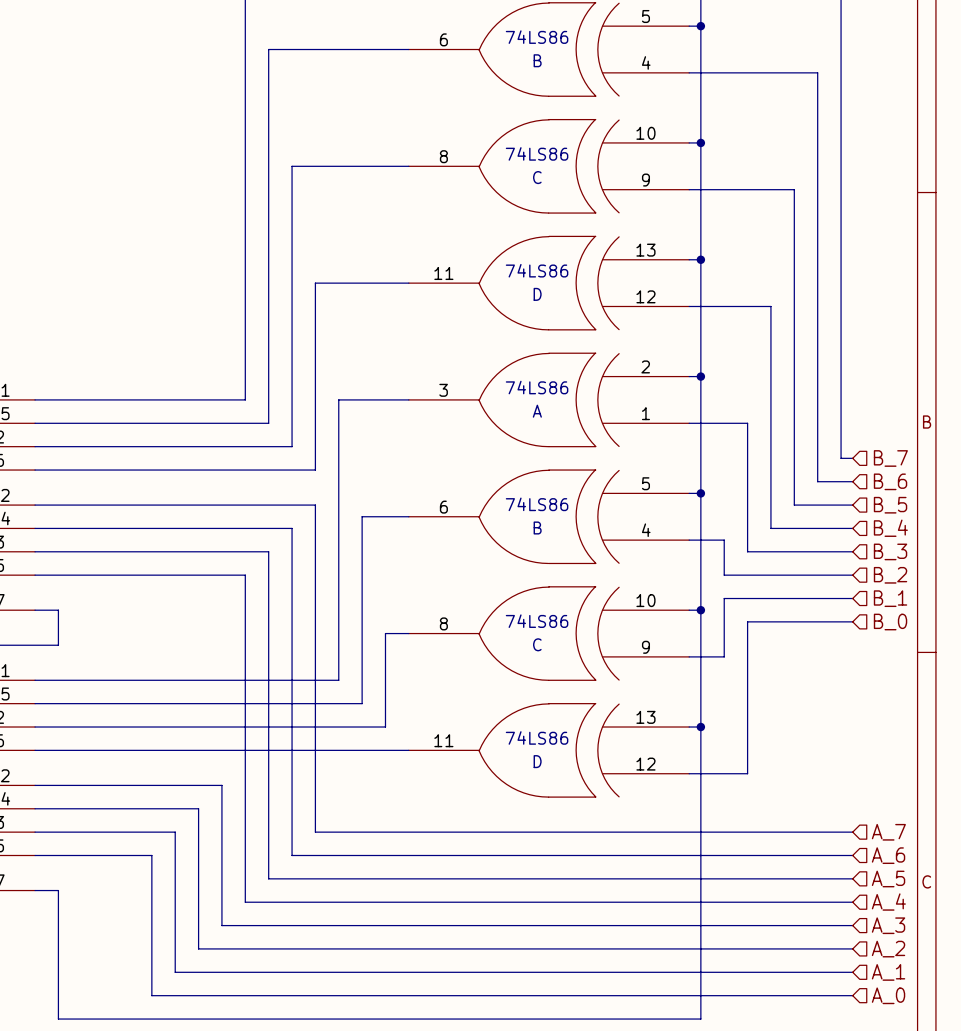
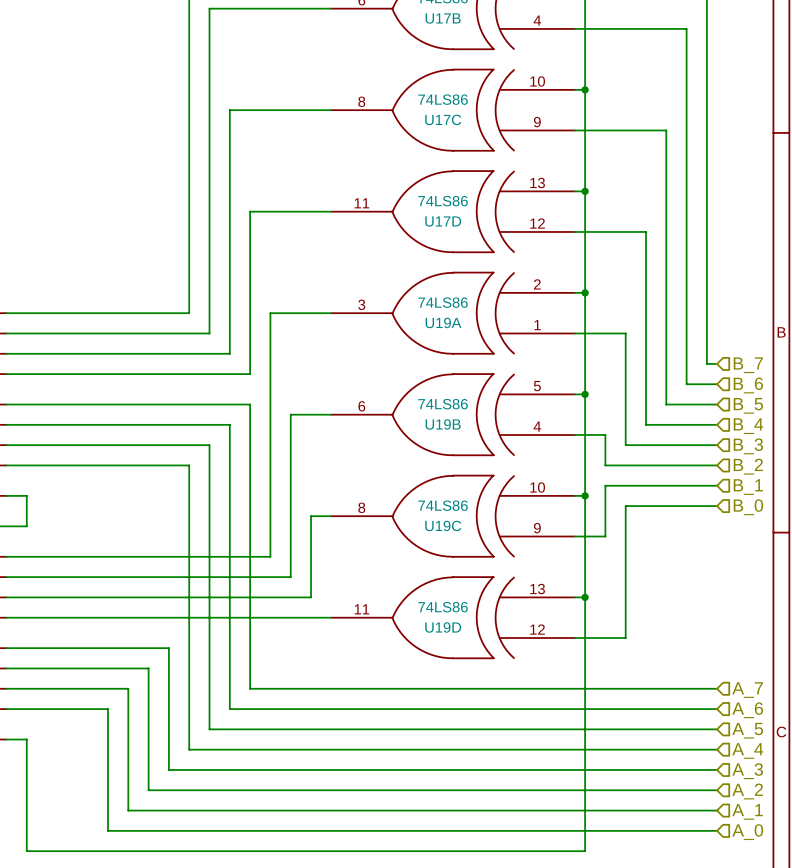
B name: B (537, 60) -> U17B (443, 18)
C name: C (537, 177) -> U17C (443, 119)
D name: D (537, 294) -> U17D (443, 221)
A name: A (537, 411) -> U19A (443, 322)
B name: B (537, 527) -> U19B (443, 424)
C name: C (537, 644) -> U19C (443, 525)
D name: D (537, 761) -> U19D (443, 627)

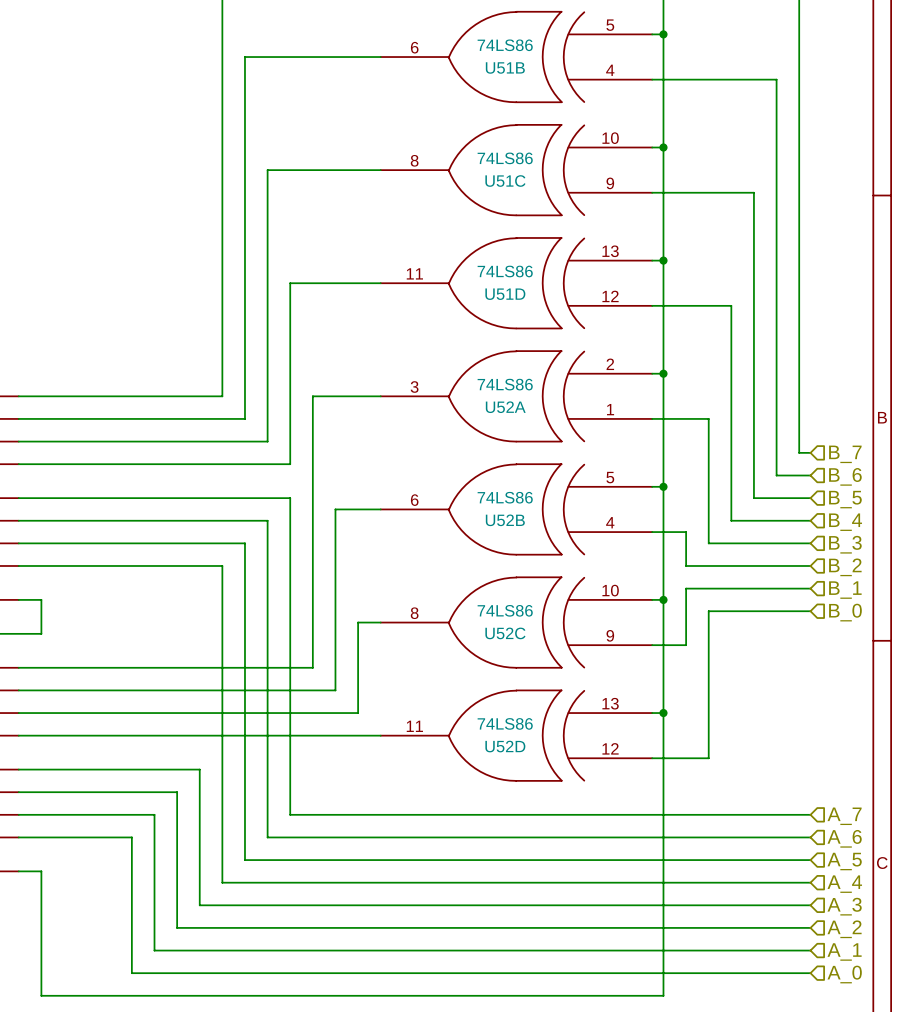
U17B name: U17B (443, 18) -> U51B (505, 67)
U17C name: U17C (443, 119) -> U51C (505, 181)
U17D name: U17D (443, 221) -> U51D (505, 294)
U19A name: U19A (443, 322) -> U52A (505, 407)
U19B name: U19B (443, 424) -> U52B (505, 520)
U19C name: U19C (443, 525) -> U52C (505, 633)
U19D name: U19D (443, 627) -> U52D (505, 746)

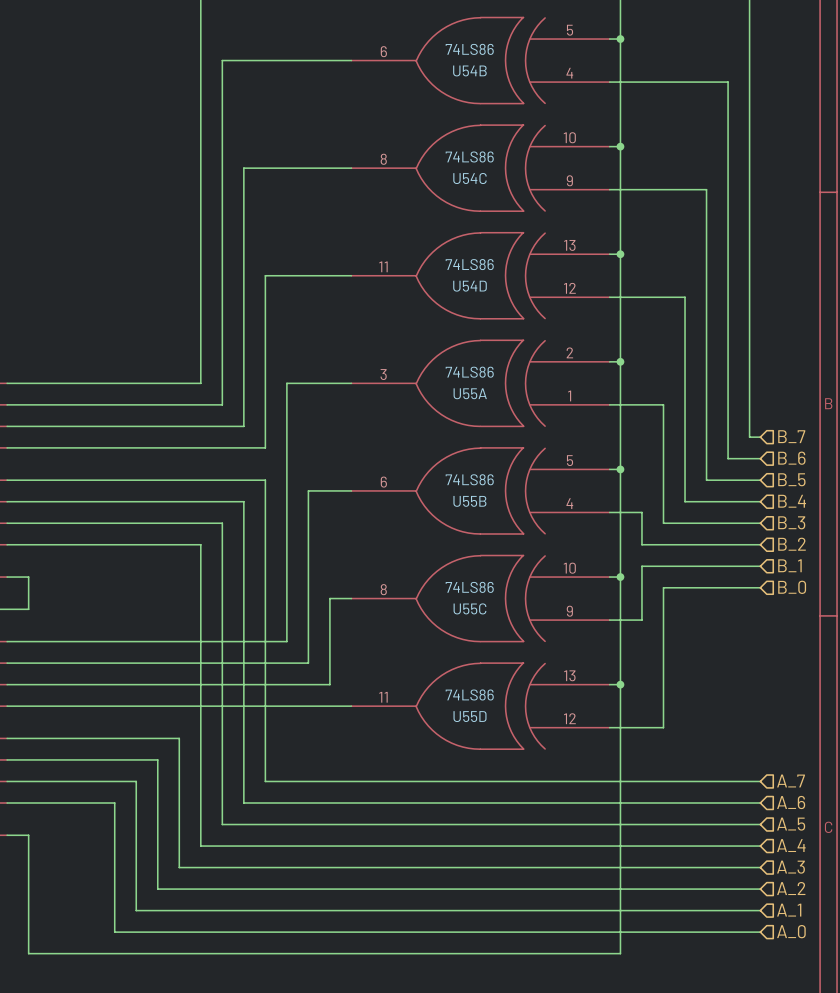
U51B name: U51B (505, 67) -> U54B (469, 70)
U51C name: U51C (505, 181) -> U54C (469, 178)
U51D name: U51D (505, 294) -> U54D (470, 286)
U52A name: U52A (505, 407) -> U55A (470, 393)
U52B name: U52B (505, 520) -> U55B (469, 501)
U52C name: U52C (505, 633) -> U55C (469, 608)
U52D name: U52D (505, 746) -> U55D (470, 716)

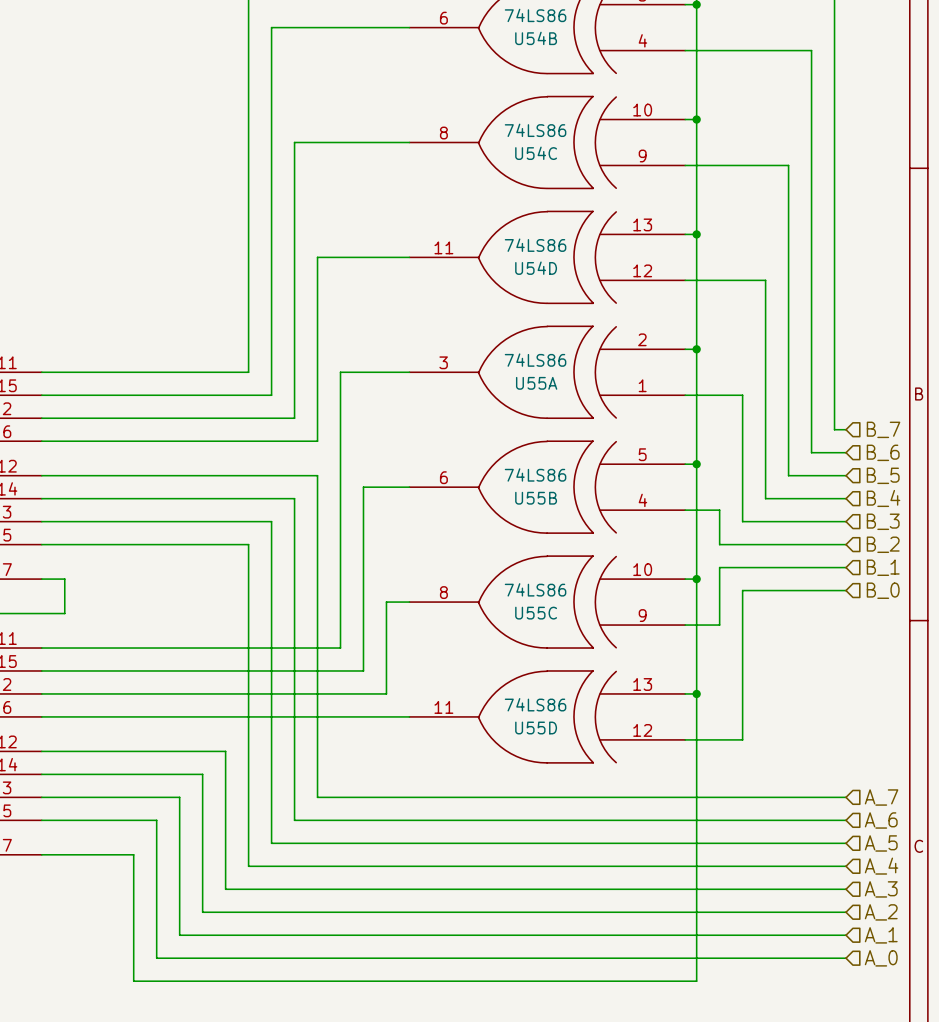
wire: (28, 835) (28, 953) (93, 953) -> (64, 854) (133, 854) (133, 981)

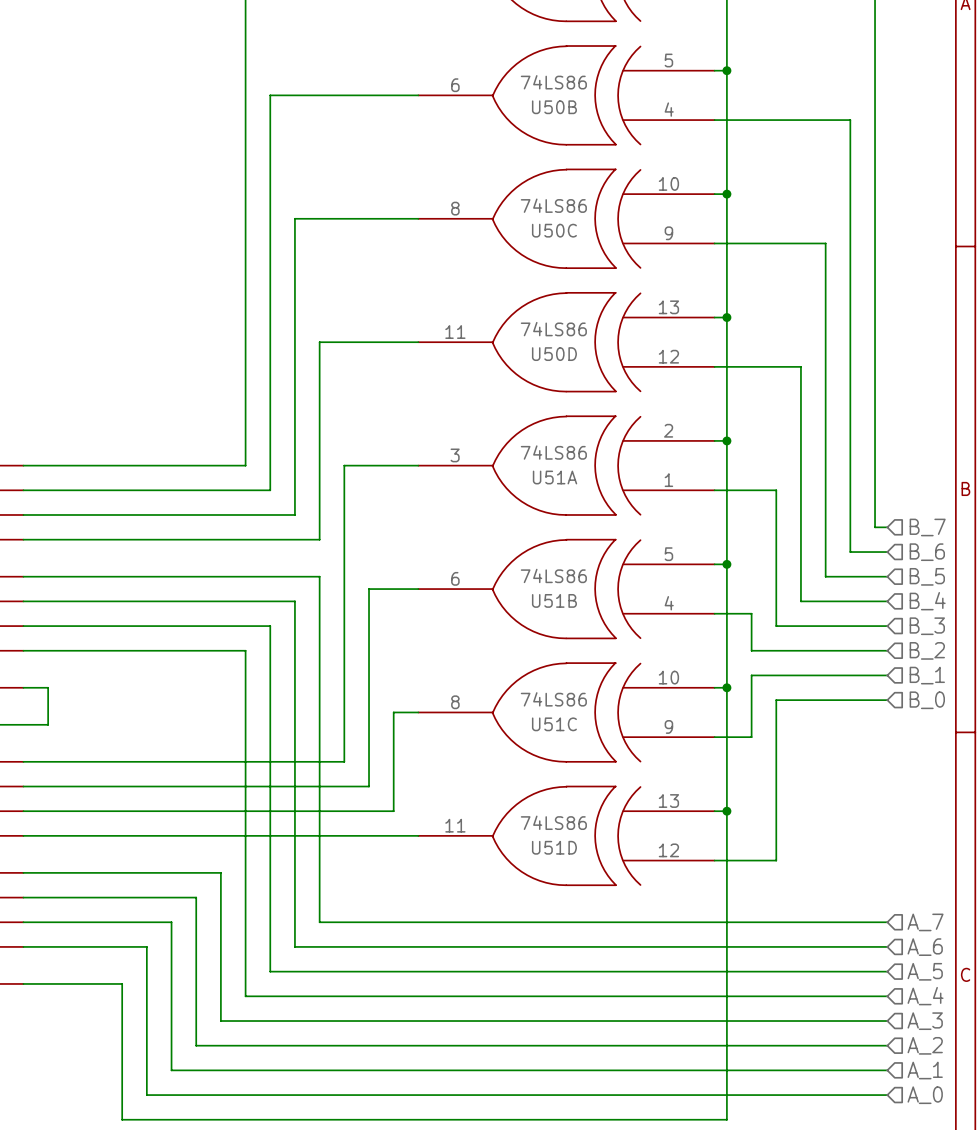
U54B name: U54B (536, 38) -> U50B (554, 107)
U54C name: U54C (536, 153) -> U50C (554, 230)
U54D name: U54D (536, 268) -> U50D (554, 354)
U55A name: U55A (536, 383) -> U51A (555, 477)
U55B name: U55B (536, 498) -> U51B (554, 600)
U55C name: U55C (536, 613) -> U51C (554, 724)
U55D name: U55D (536, 728) -> U51D (554, 847)

